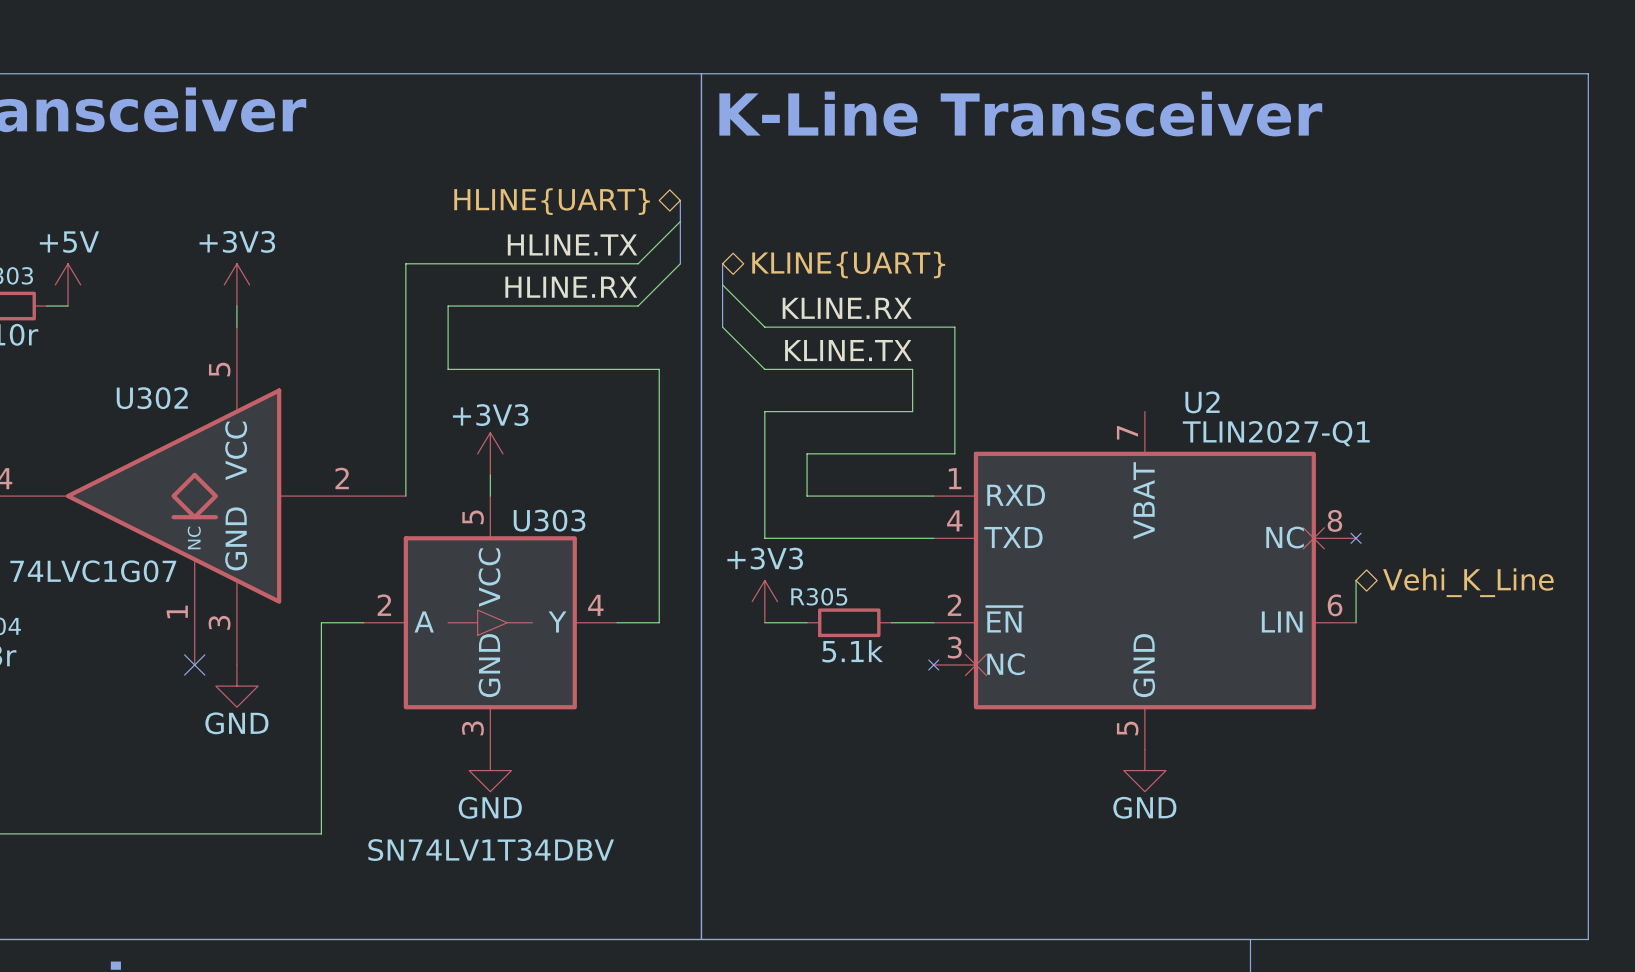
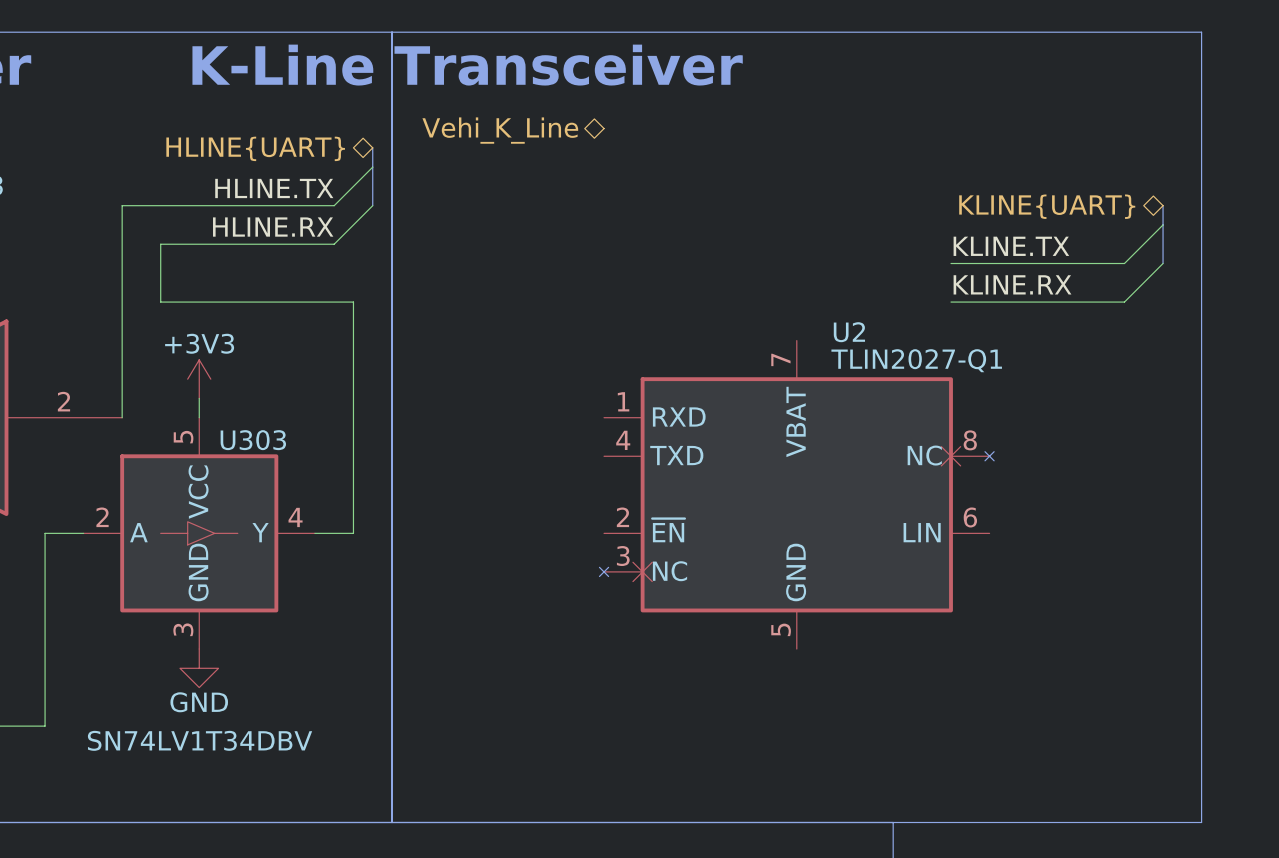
text position: K-Line Transceiver (1020, 114) -> K-Line Transceiver (467, 65)
hierarchical label: none -> Vehi_K_Line (500, 130)
bus: (722, 263) (722, 327) -> none
bus: none -> (1163, 205) (1163, 263)
hierarchical label: KLINE{UART} (848, 264) -> none
hierarchical label: none -> KLINE{UART} (1047, 206)
wire: (722, 284) (764, 327) (954, 327) (954, 453) (807, 453) (807, 496) (933, 496) -> none
wire: none -> (1163, 224) (1124, 263) (951, 263)
label position: KLINE.RX (847, 308) -> KLINE.RX (1012, 284)
wire: (722, 327) (764, 369) (912, 369) (912, 411) (764, 411) (764, 538) (933, 538) -> none
wire: none -> (1163, 263) (1124, 302) (951, 302)
label position: KLINE.TX (848, 350) -> KLINE.TX (1011, 246)
wire: (1356, 580) (1356, 622) -> none
hierarchical label: Vehi_K_Line (1468, 582) -> none
power symbol: +3V3 (764, 601) -> none
wire: (764, 622) (807, 622) -> none
R305: 5.1k (849, 622) -> none
wire: (891, 622) (933, 622) -> none
power symbol: GND (1144, 770) -> none

